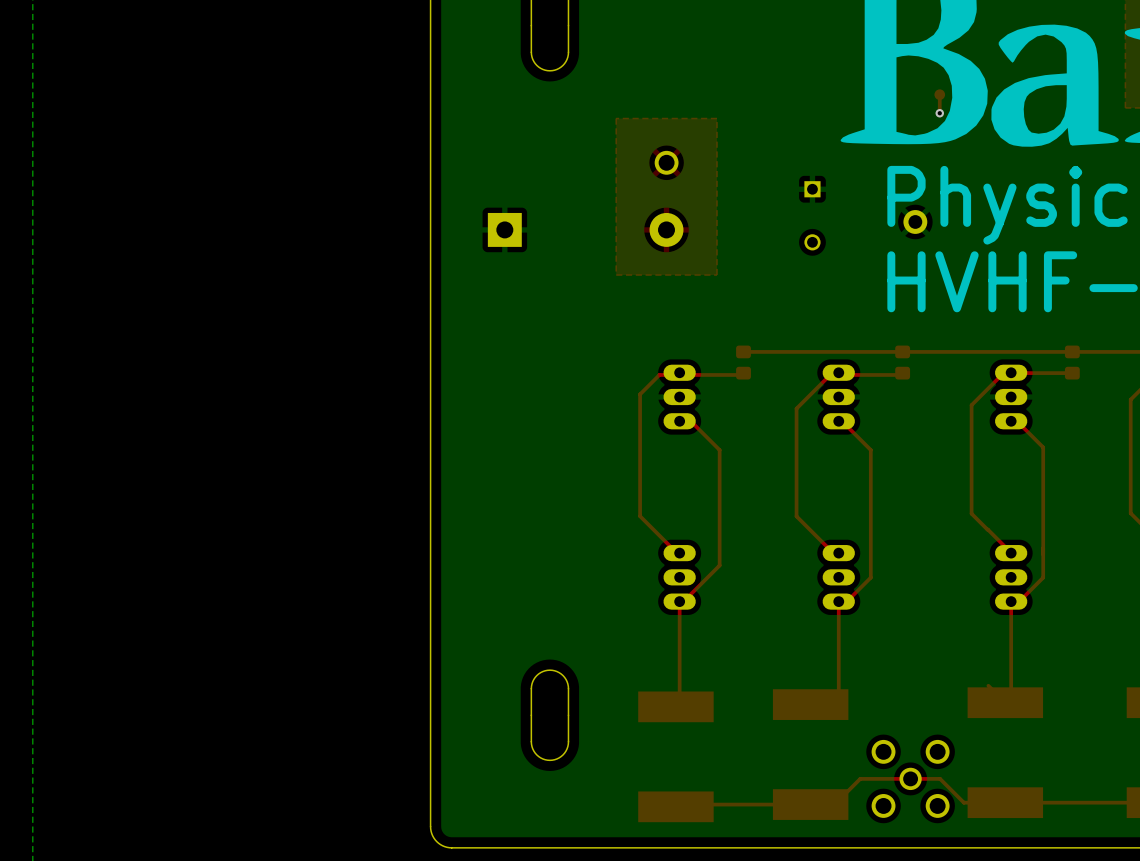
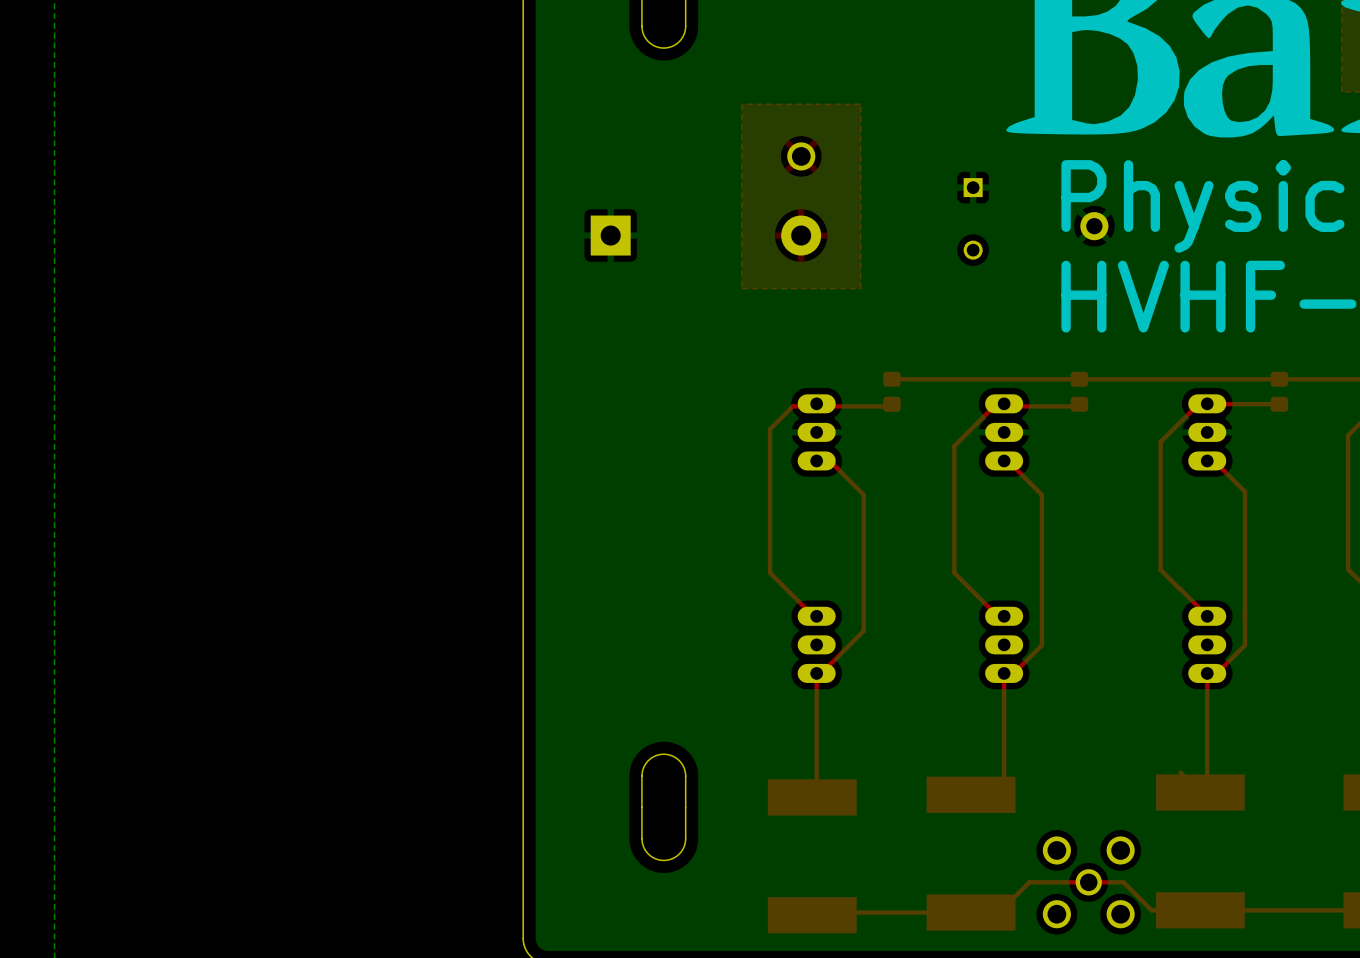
top track: (939, 94) (939, 113) -> none
part: (939, 94) -> none
via: (939, 113) -> none

